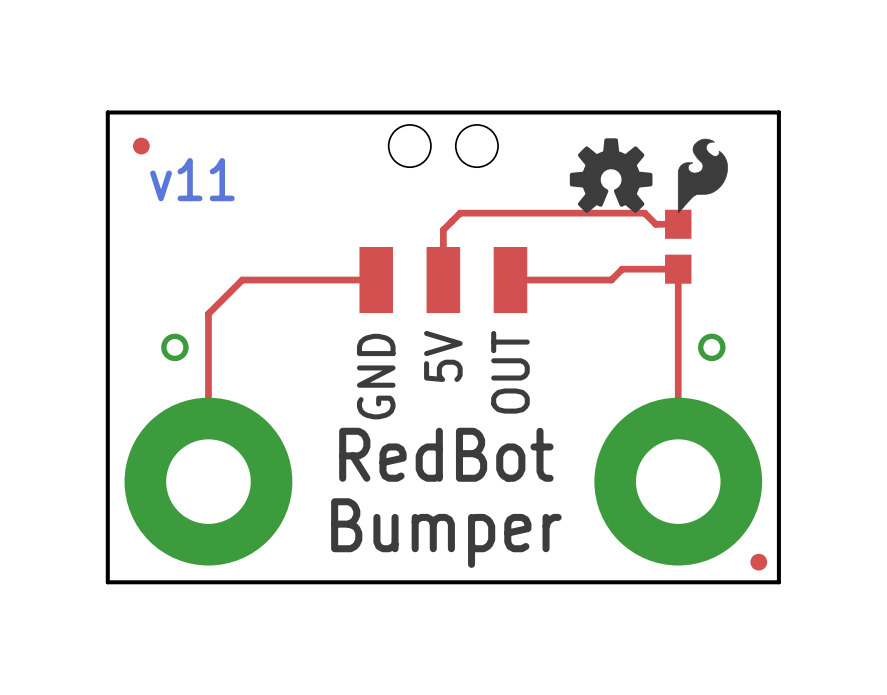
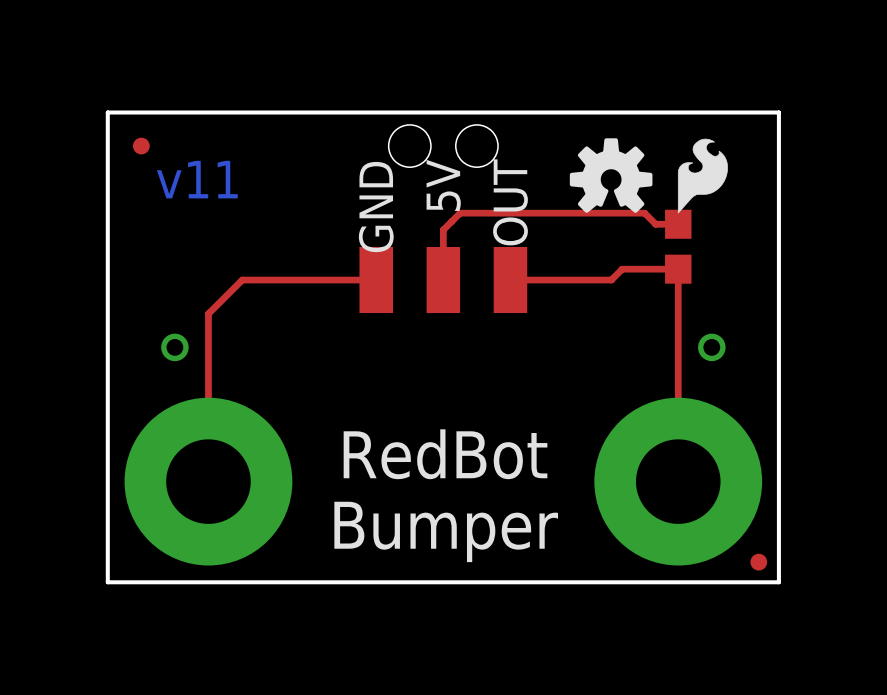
text position: 5V (443, 356) -> 5V (443, 185)
text position: OUT (510, 372) -> OUT (510, 202)
text position: GND (376, 376) -> GND (376, 207)

